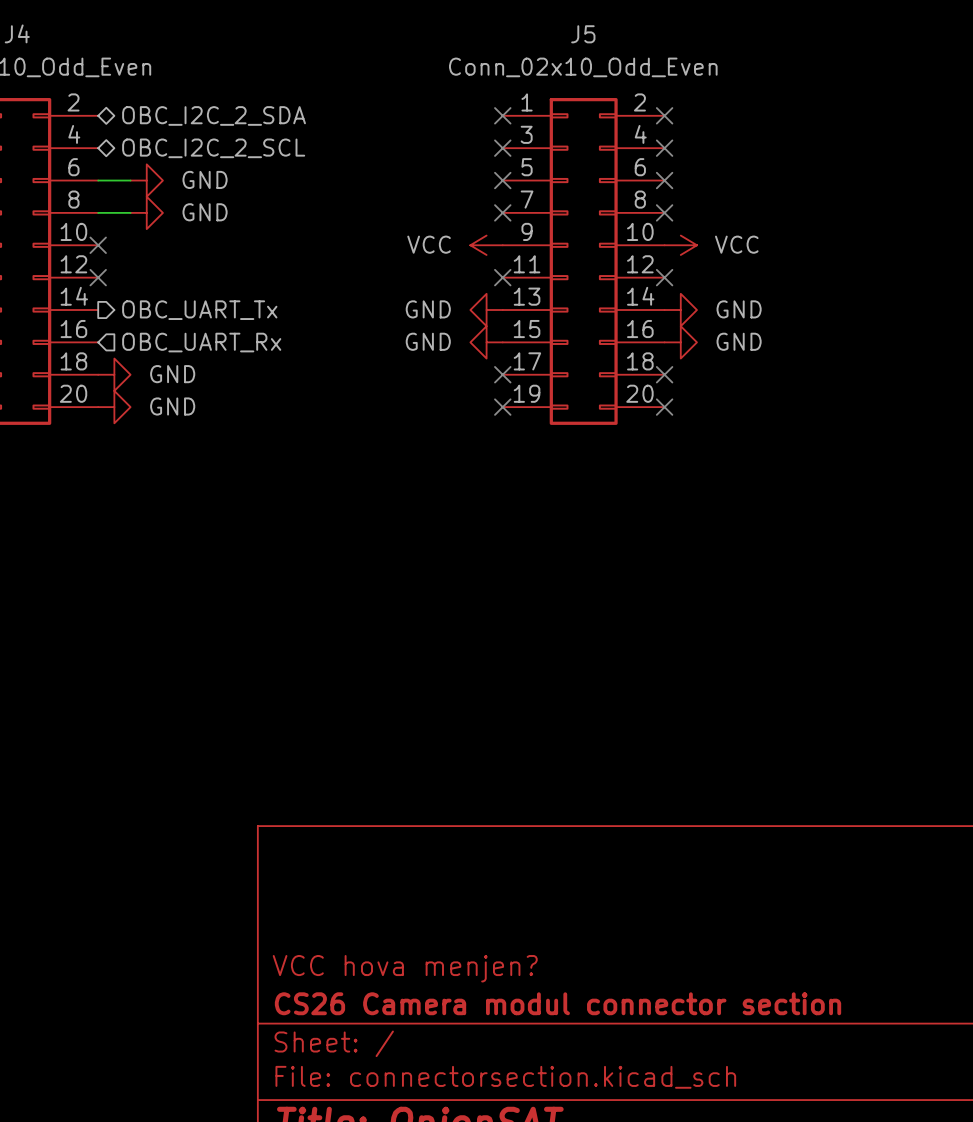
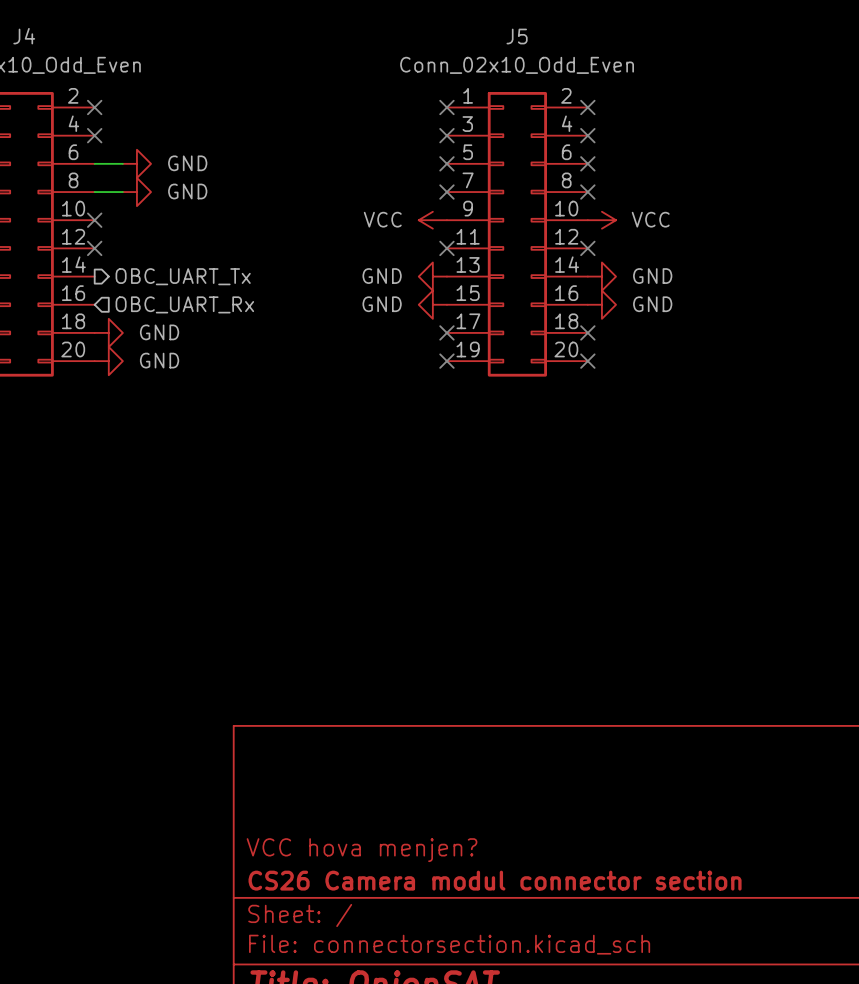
no-connect mark: none -> (94, 107)
hierarchical label: OBC_I2C_2_SDA (214, 115) -> none
no-connect mark: none -> (94, 135)
hierarchical label: OBC_I2C_2_SCL (213, 148) -> none

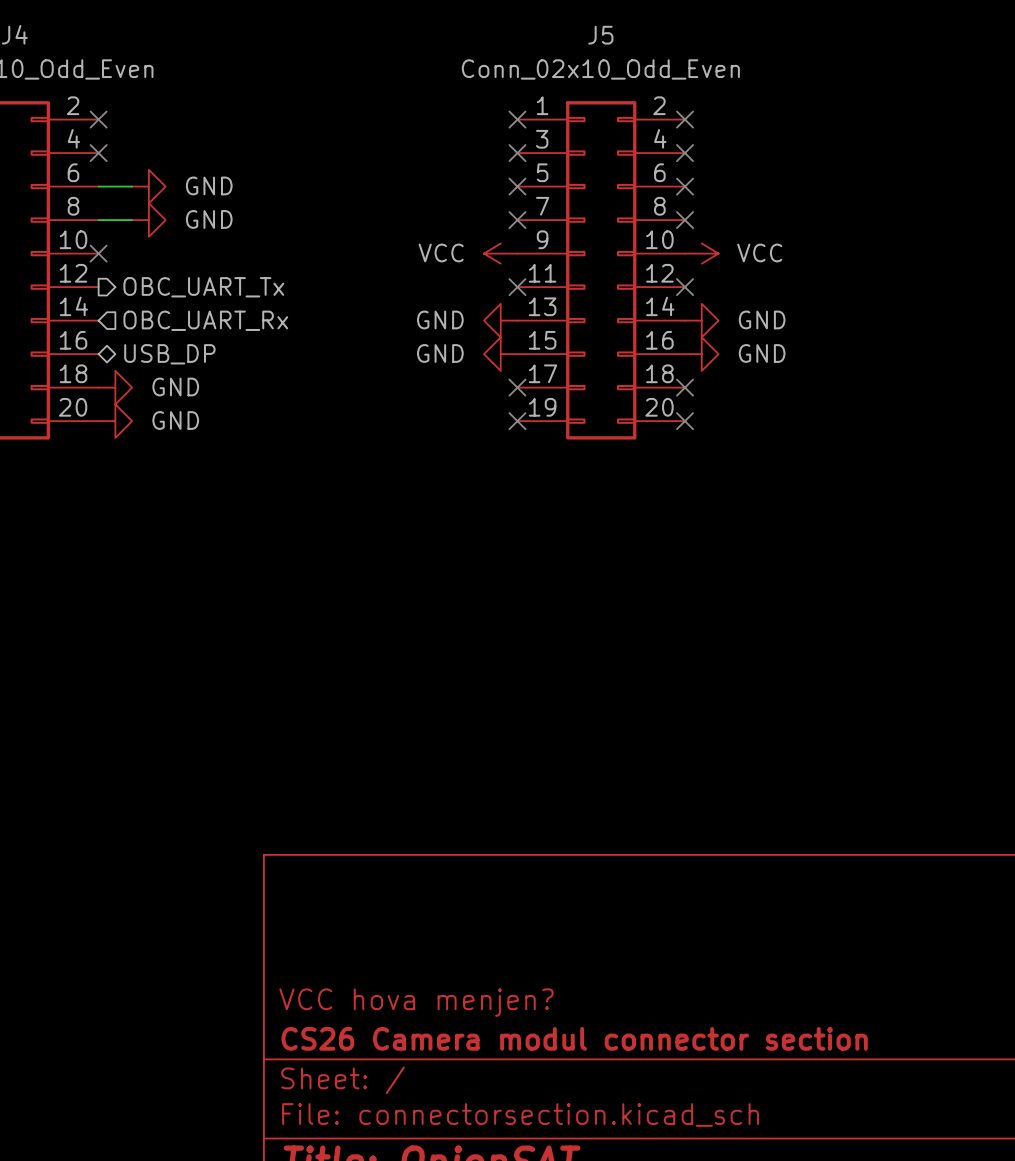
no-connect mark: (94, 248) -> none
hierarchical label: none -> OBC_UART_Tx (203, 287)
hierarchical label shape: output (183, 276) -> input (205, 320)
hierarchical label: OBC_UART_Tx (183, 276) -> OBC_UART_Rx (205, 320)
hierarchical label shape: input (184, 304) -> bidirectional (169, 354)
hierarchical label: OBC_UART_Rx (184, 304) -> USB_DP (169, 354)

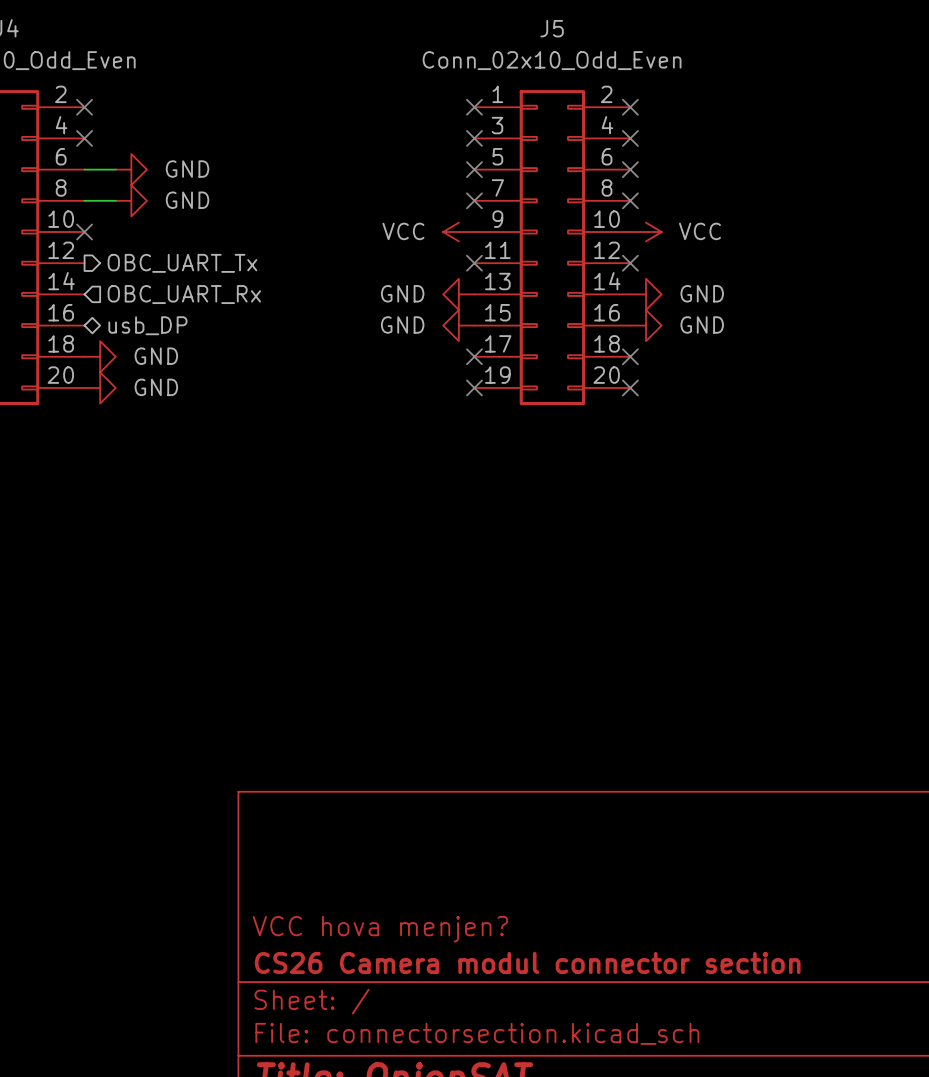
hierarchical label: USB_DP (169, 354) -> usb_DP (147, 325)

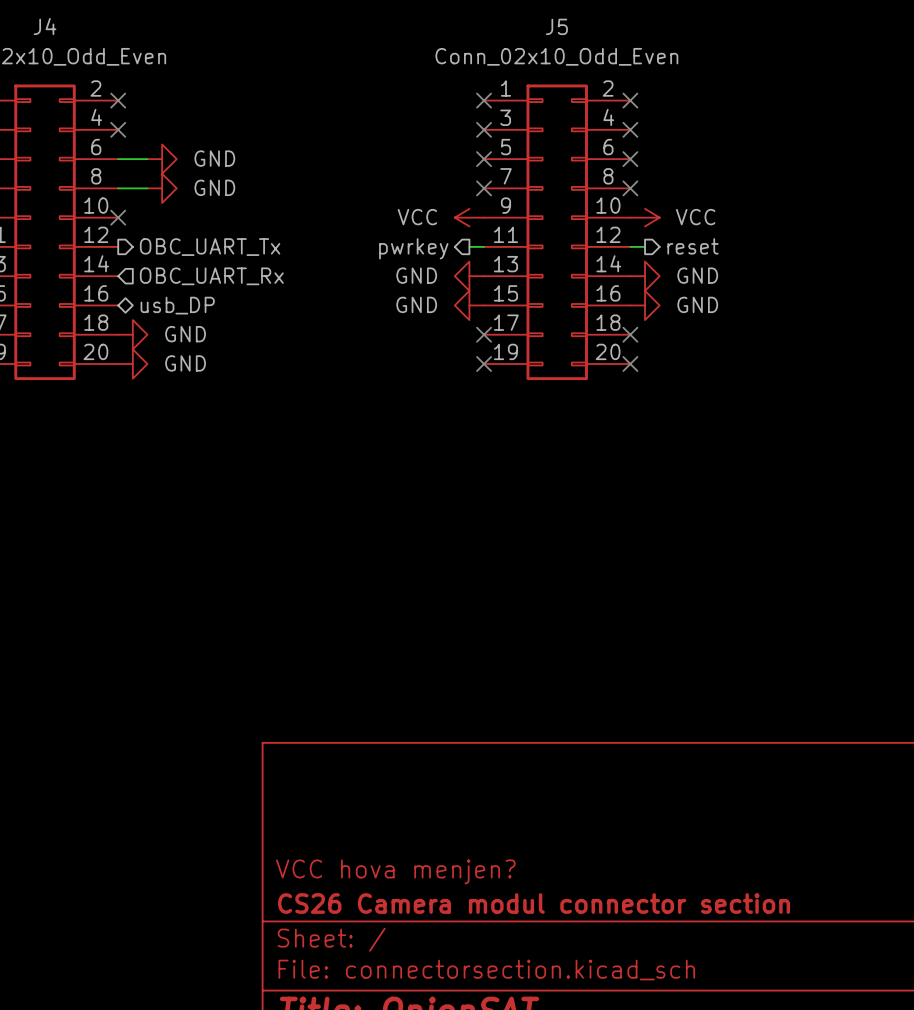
hierarchical label: none -> reset (692, 246)
wire: none -> (469, 246) (484, 246)
no-connect mark: (474, 263) -> none
wire: none -> (630, 246) (645, 246)
no-connect mark: (630, 263) -> none
hierarchical label: none -> pwrkey (413, 248)

